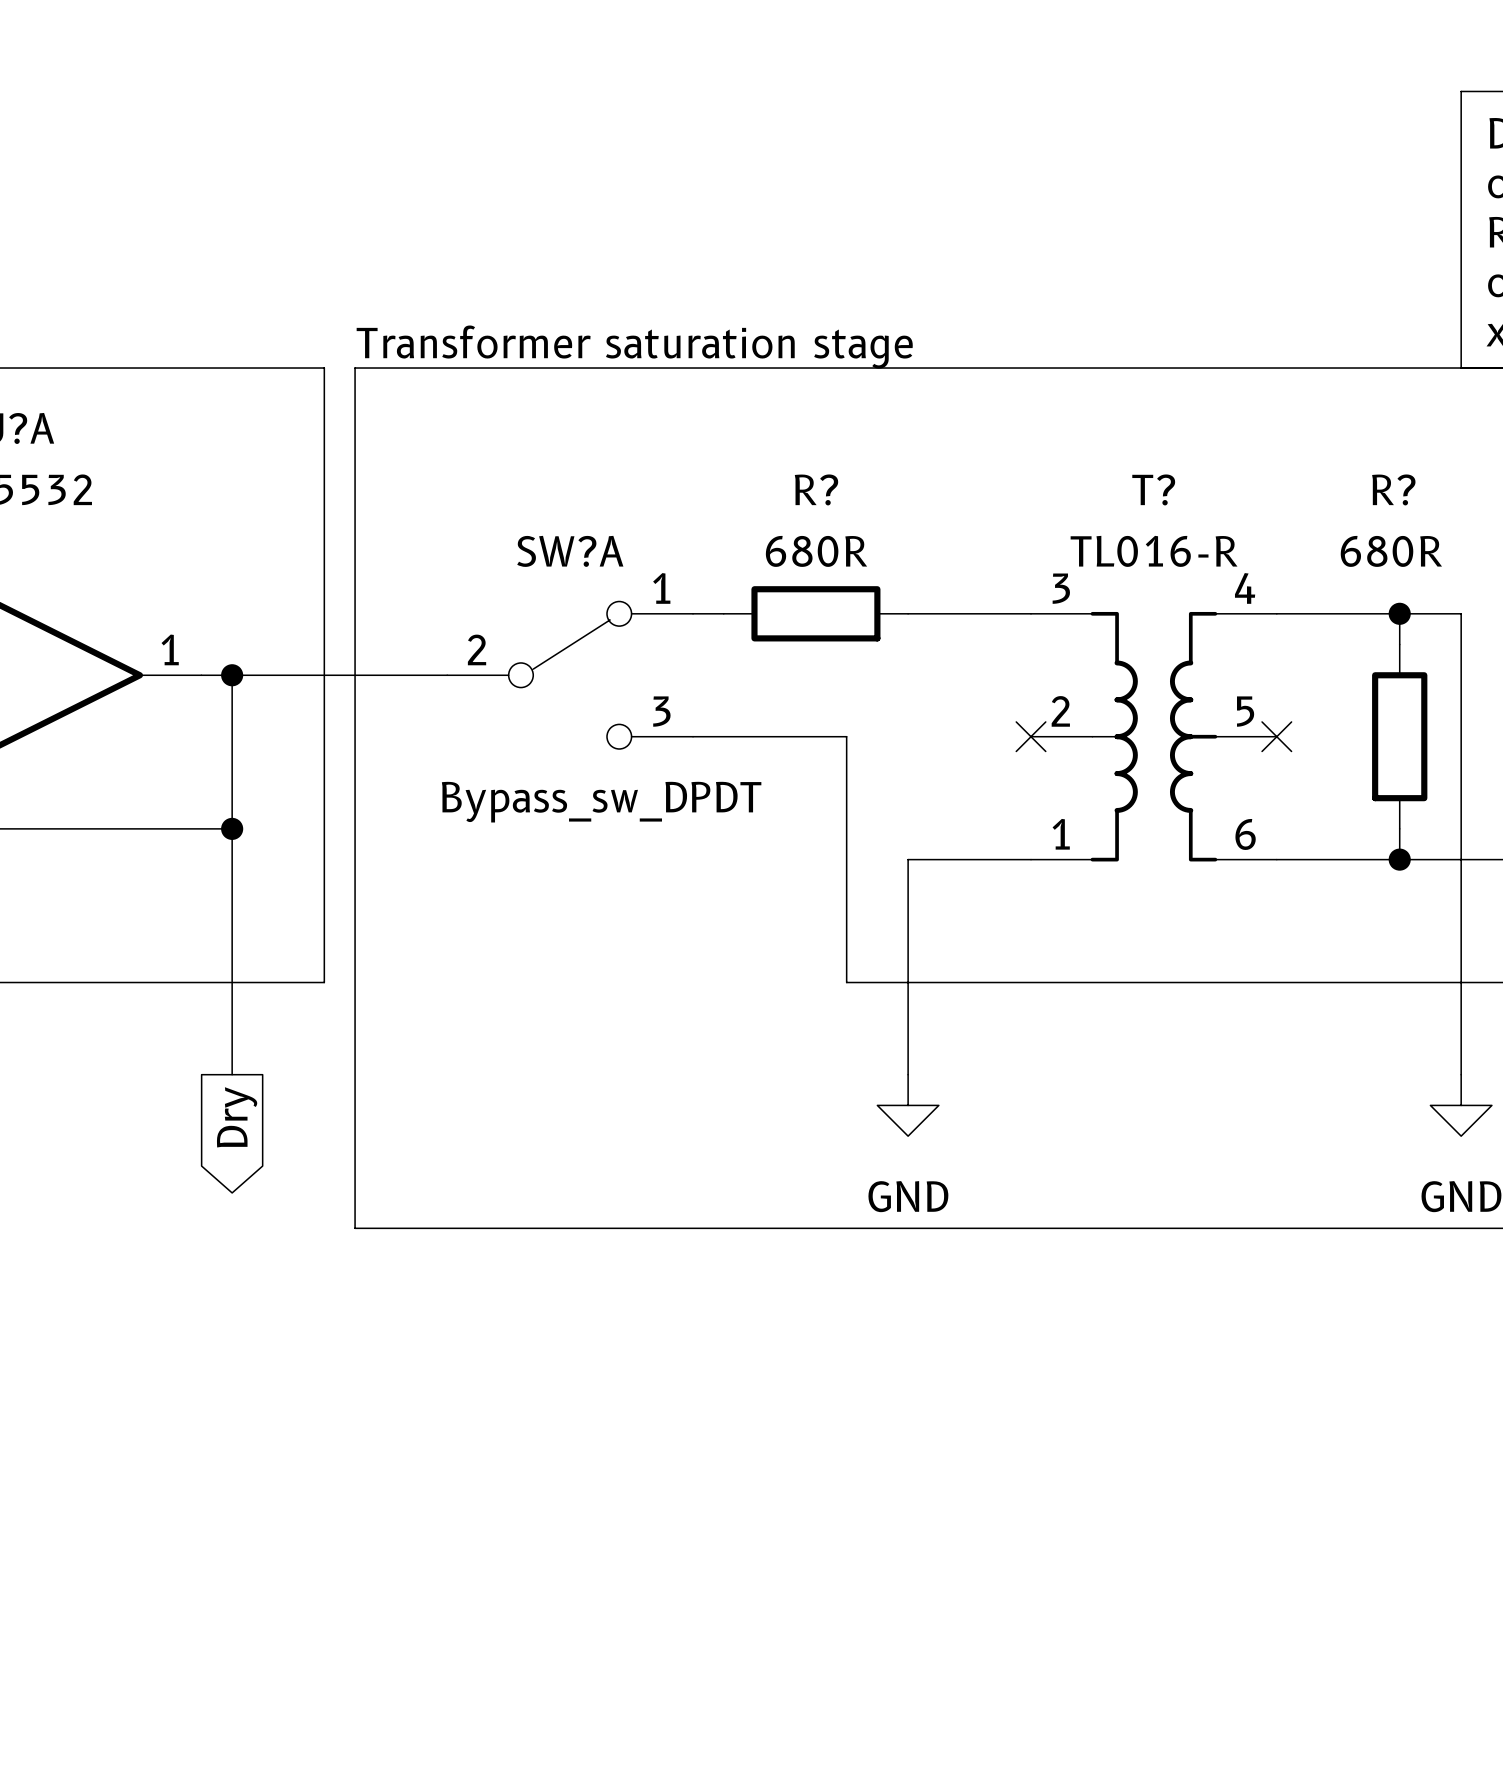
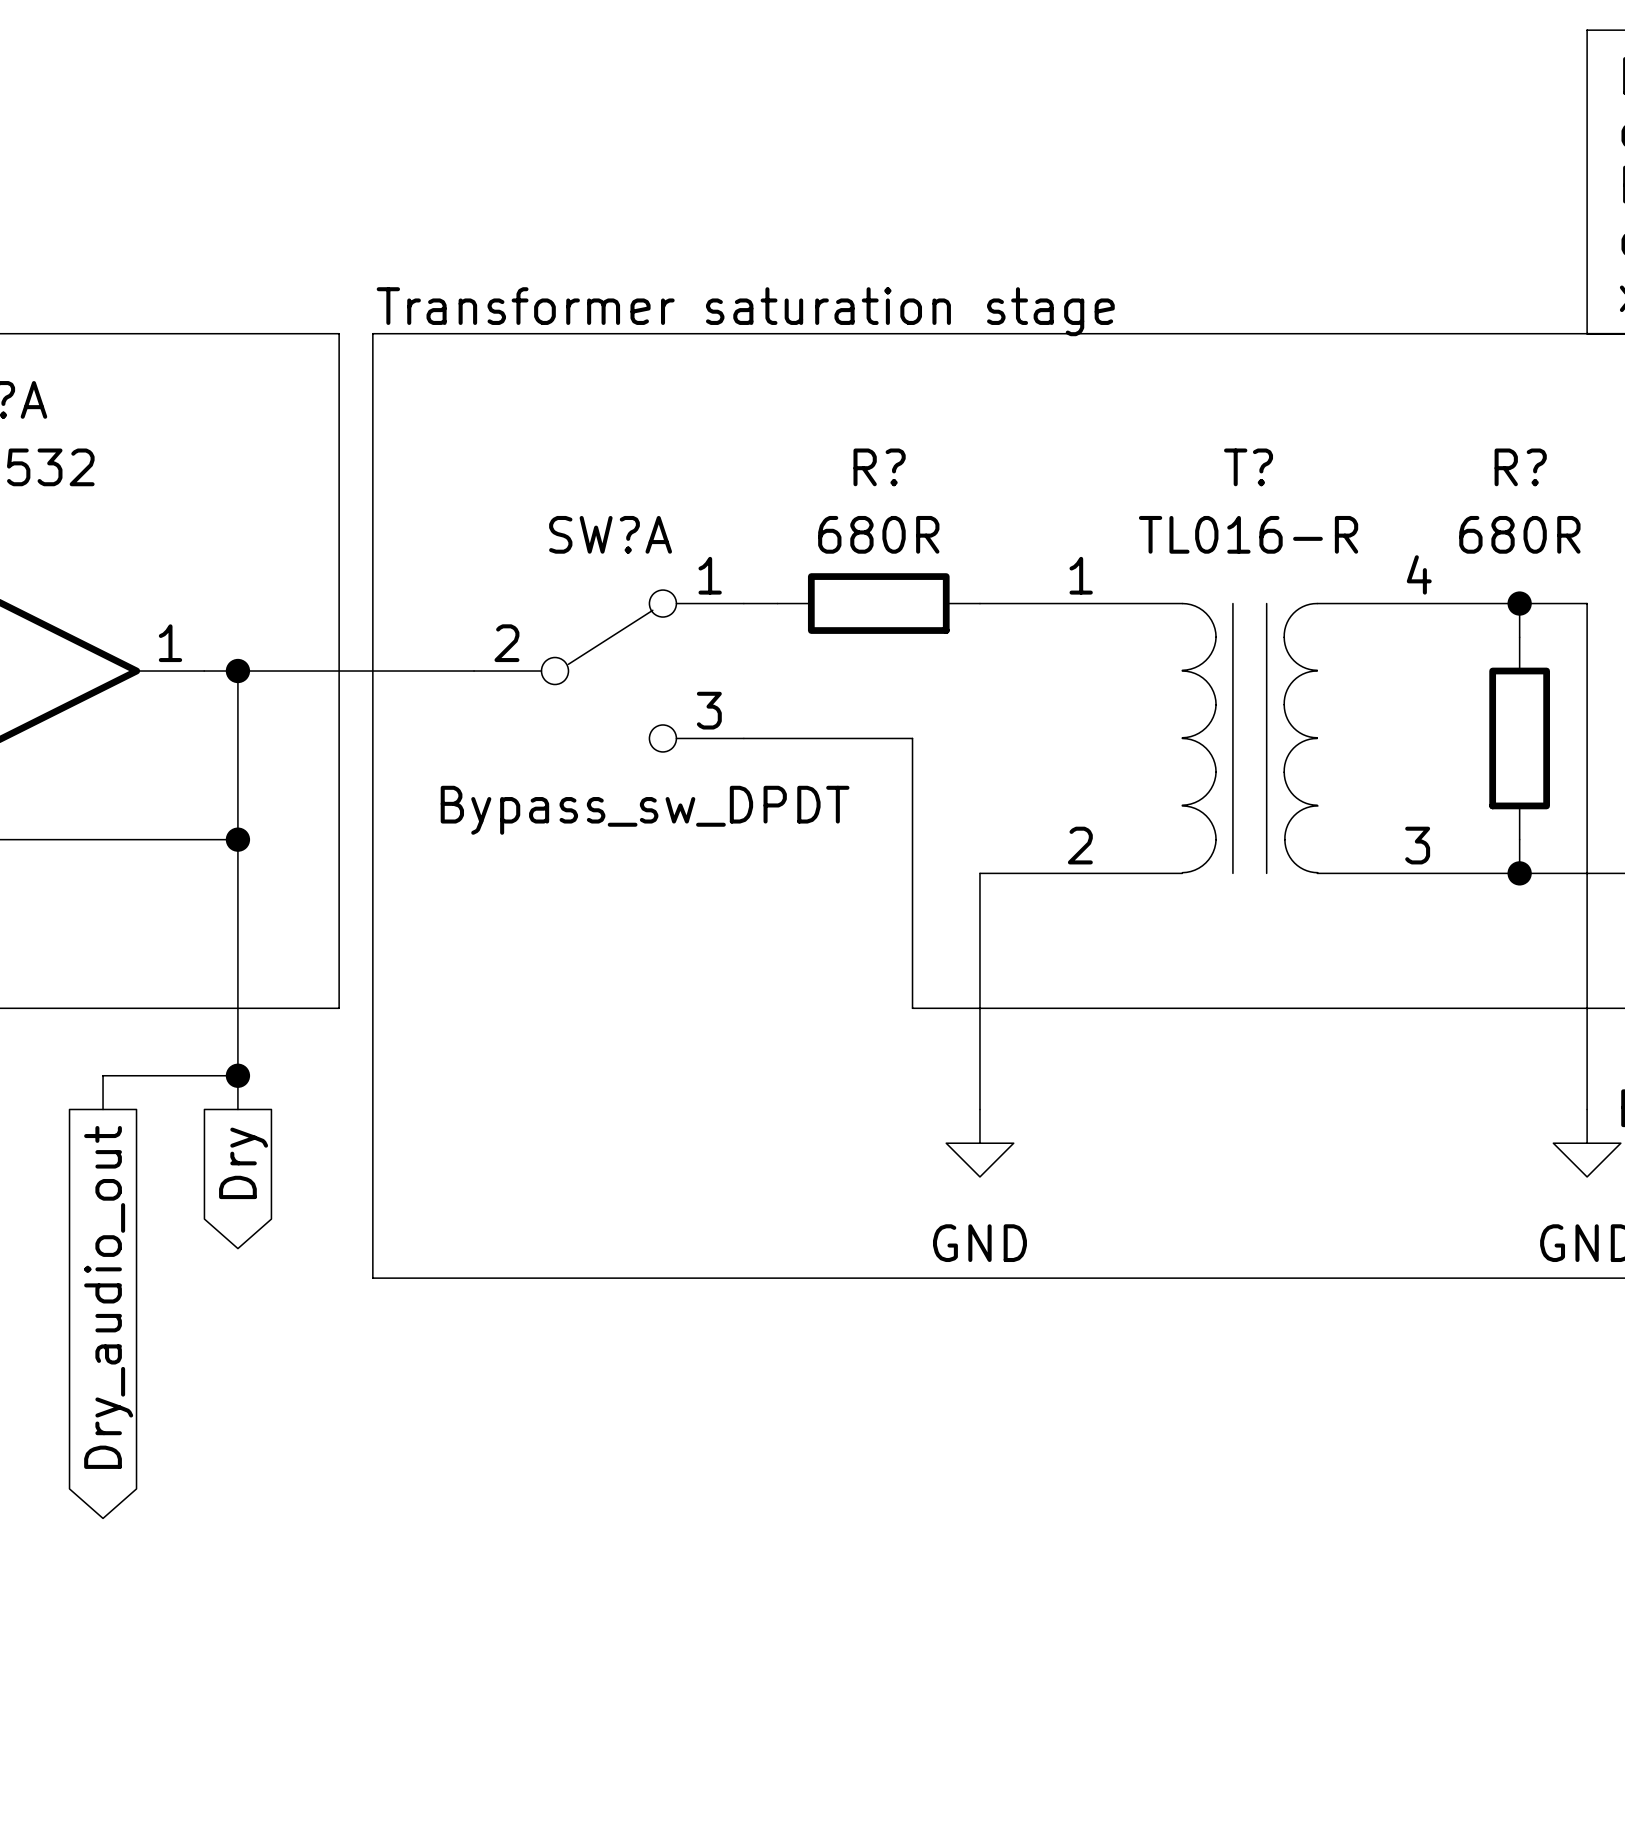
T? symbol: [1031, 611, 1277, 862] -> [979, 603, 1520, 874]
no-connect mark: (1031, 736) -> none
no-connect mark: (1276, 736) -> none
wire: none -> (237, 1075) (103, 1075) (103, 1109)
junction: none -> (237, 1075)
global label: none -> Dry_audio_out (108, 1297)

